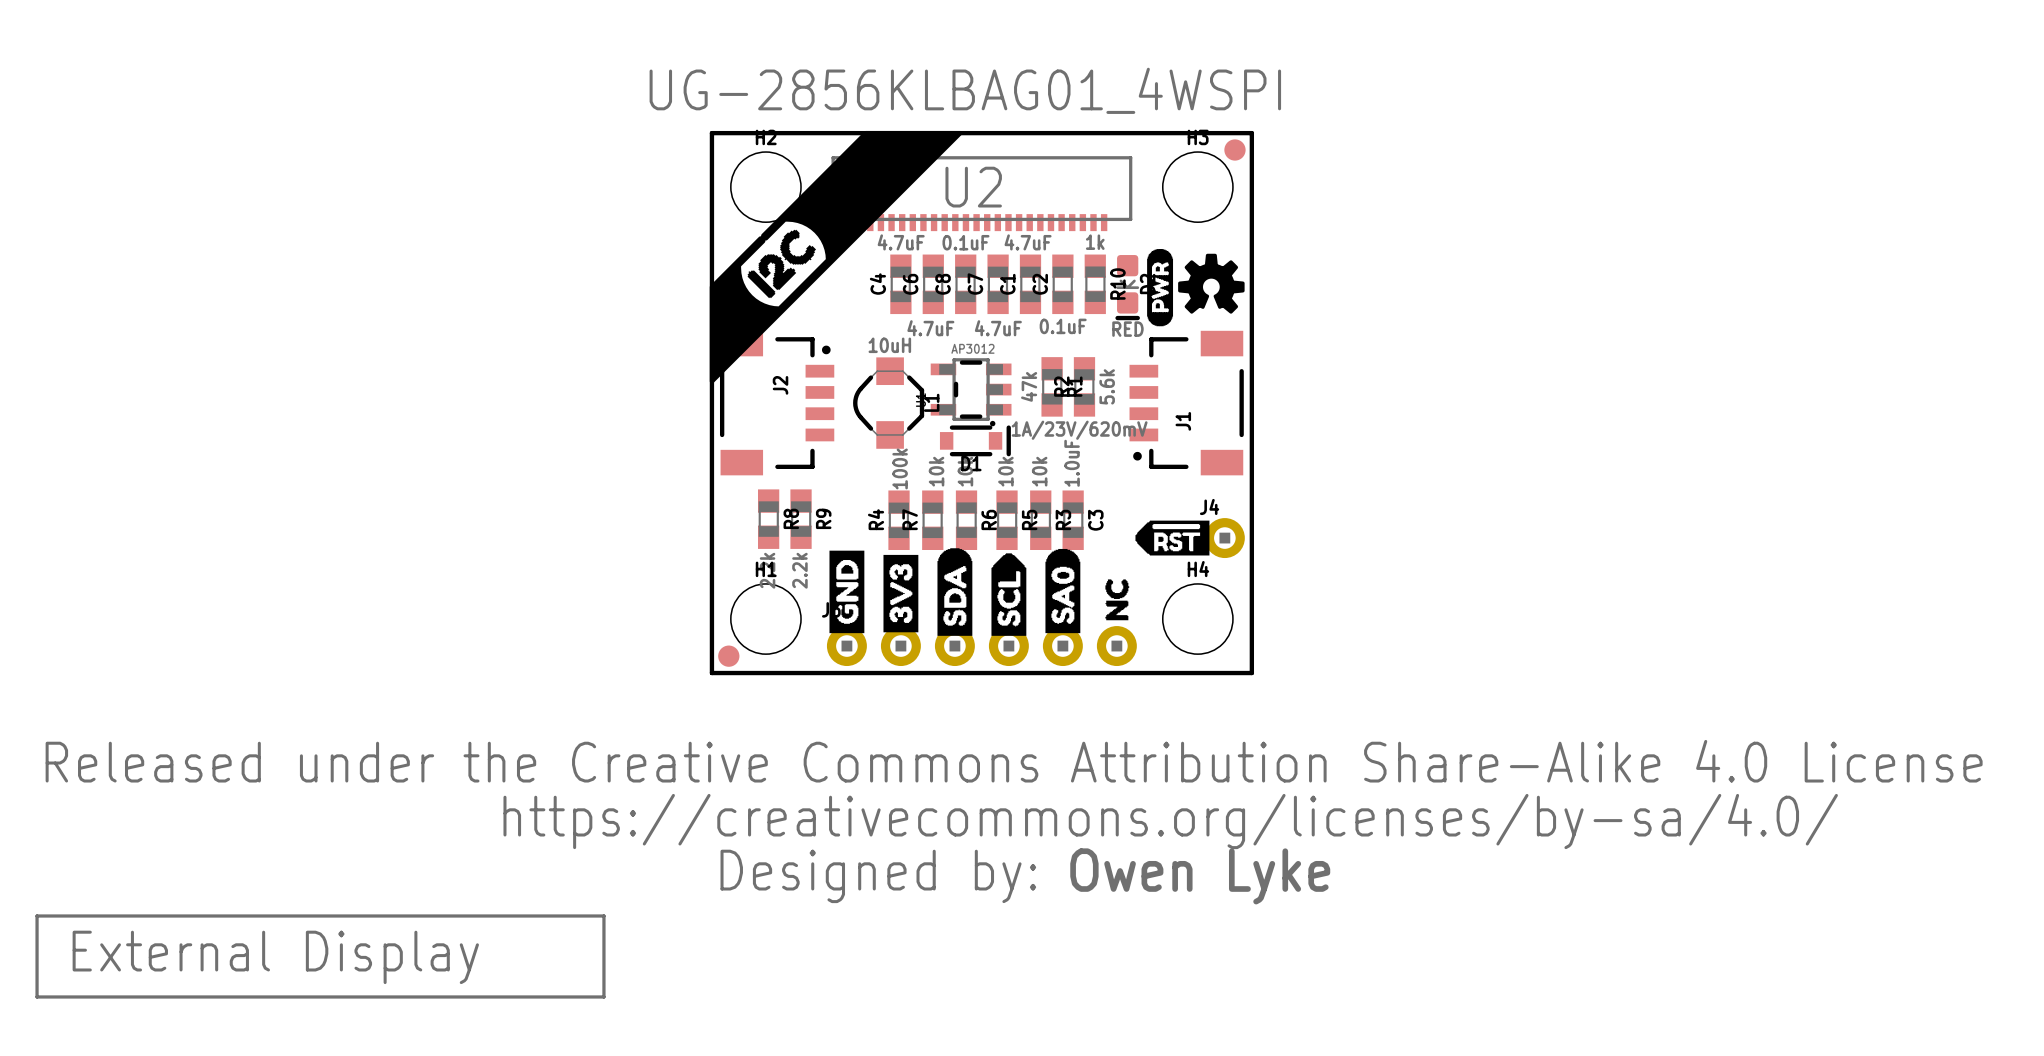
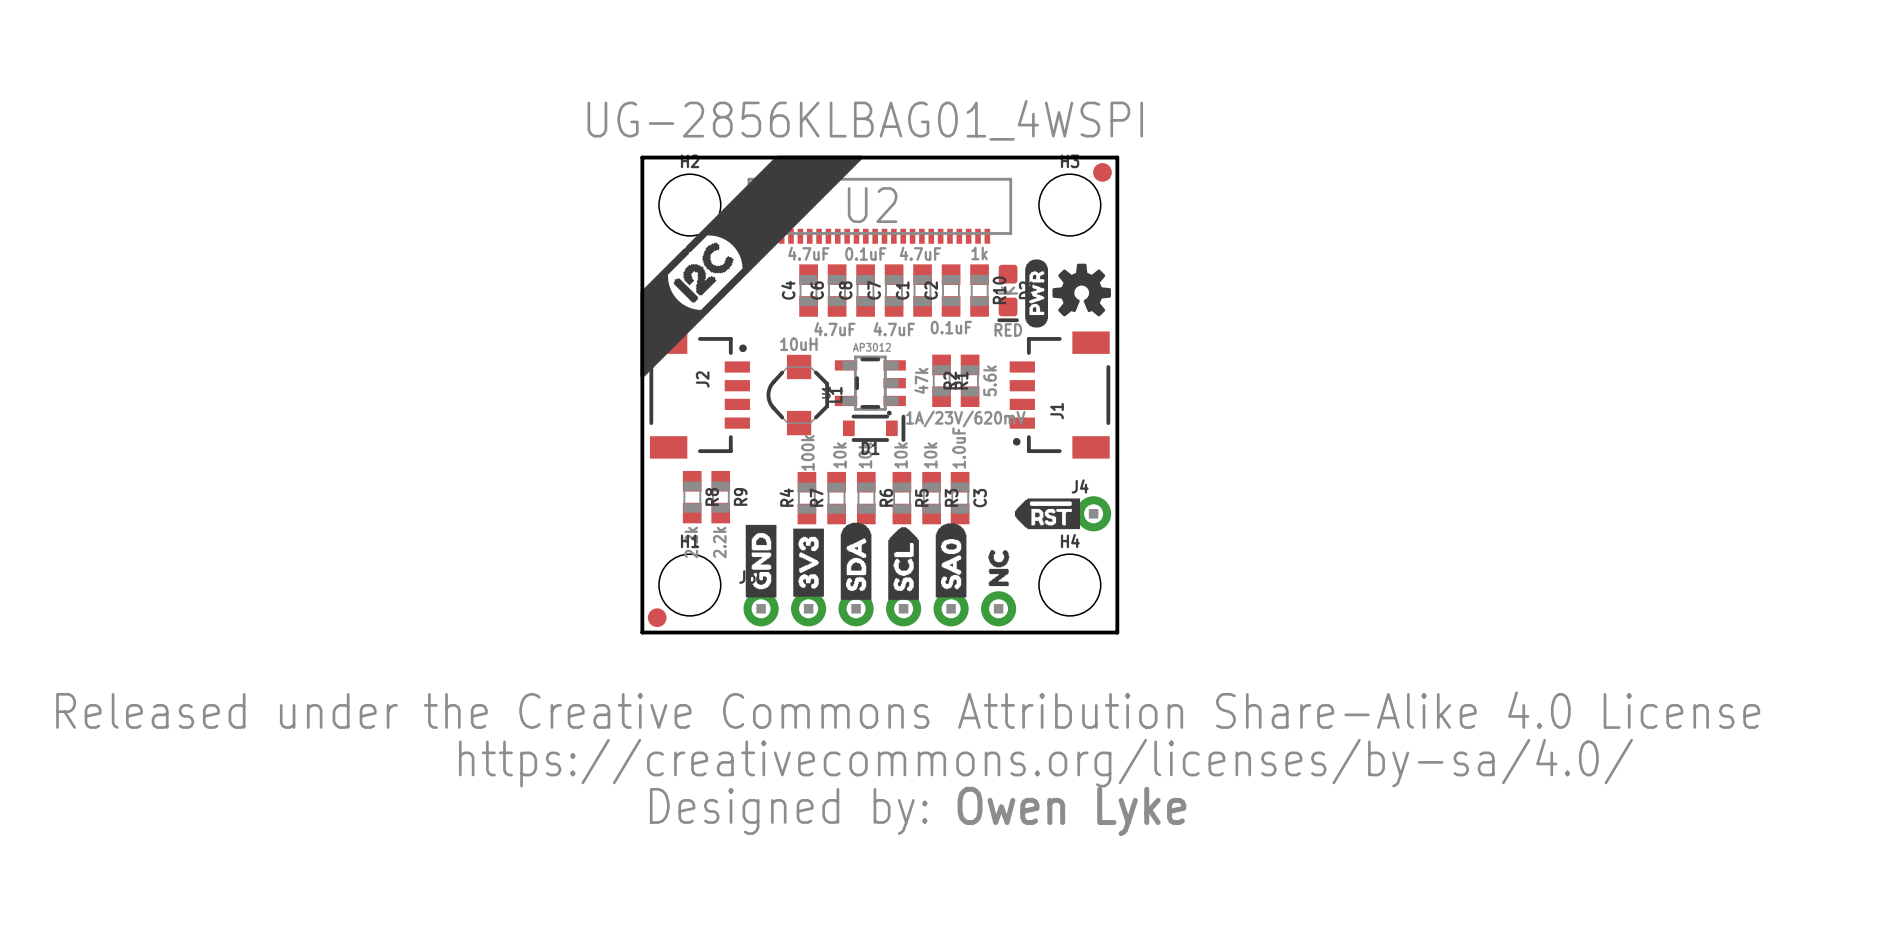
drawing: [35, 914, 606, 999] -> none

